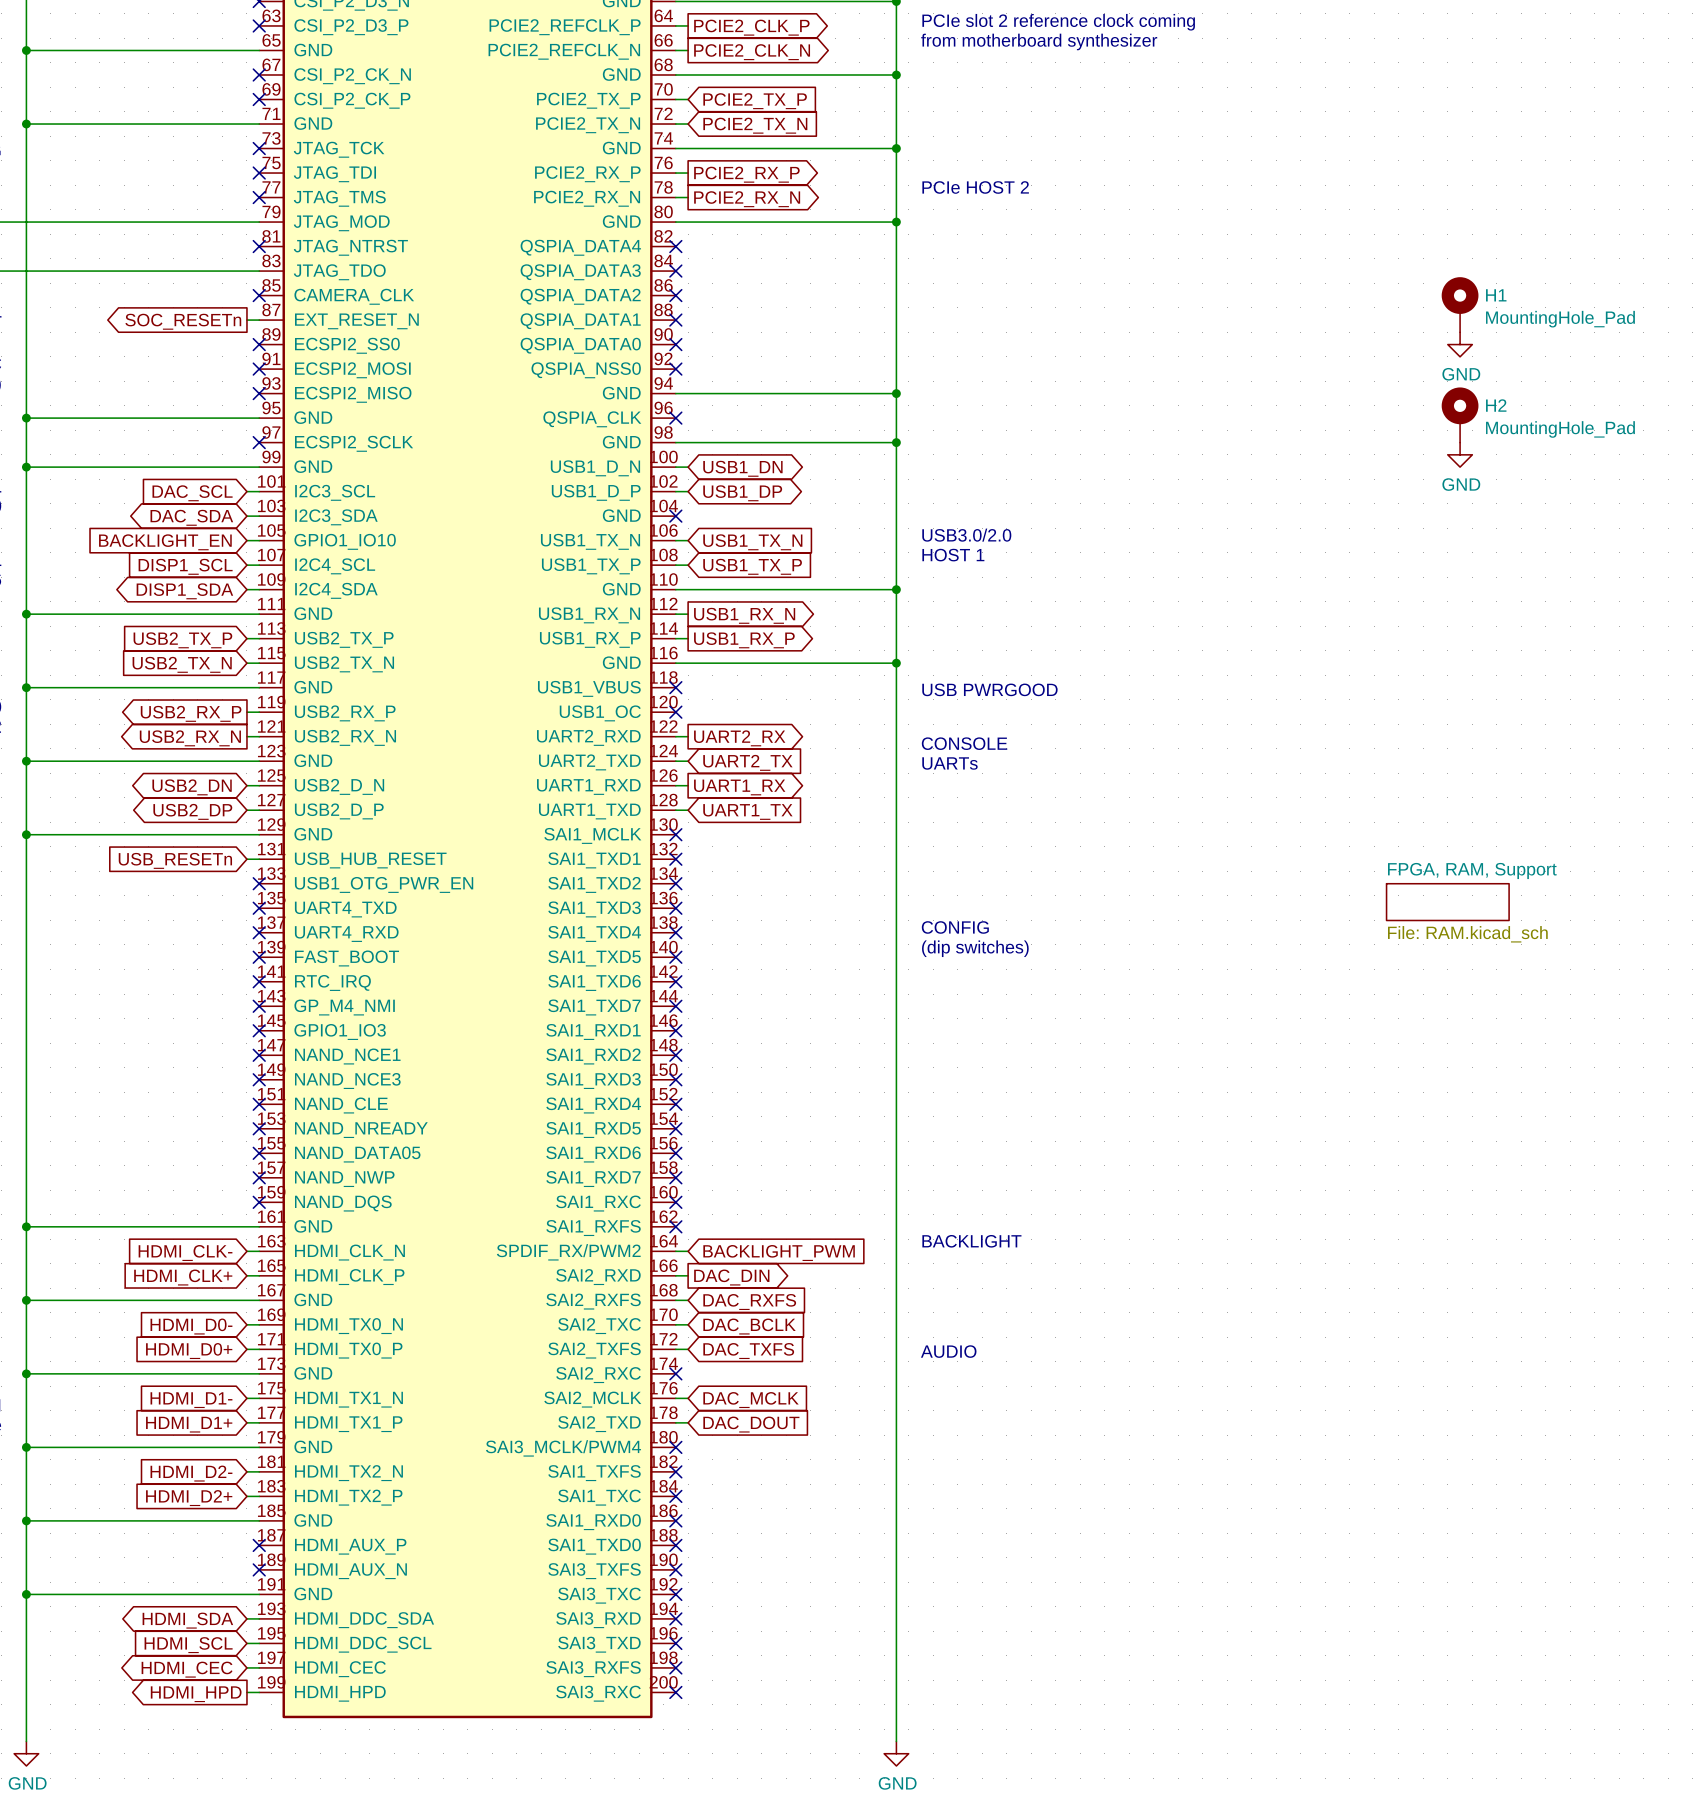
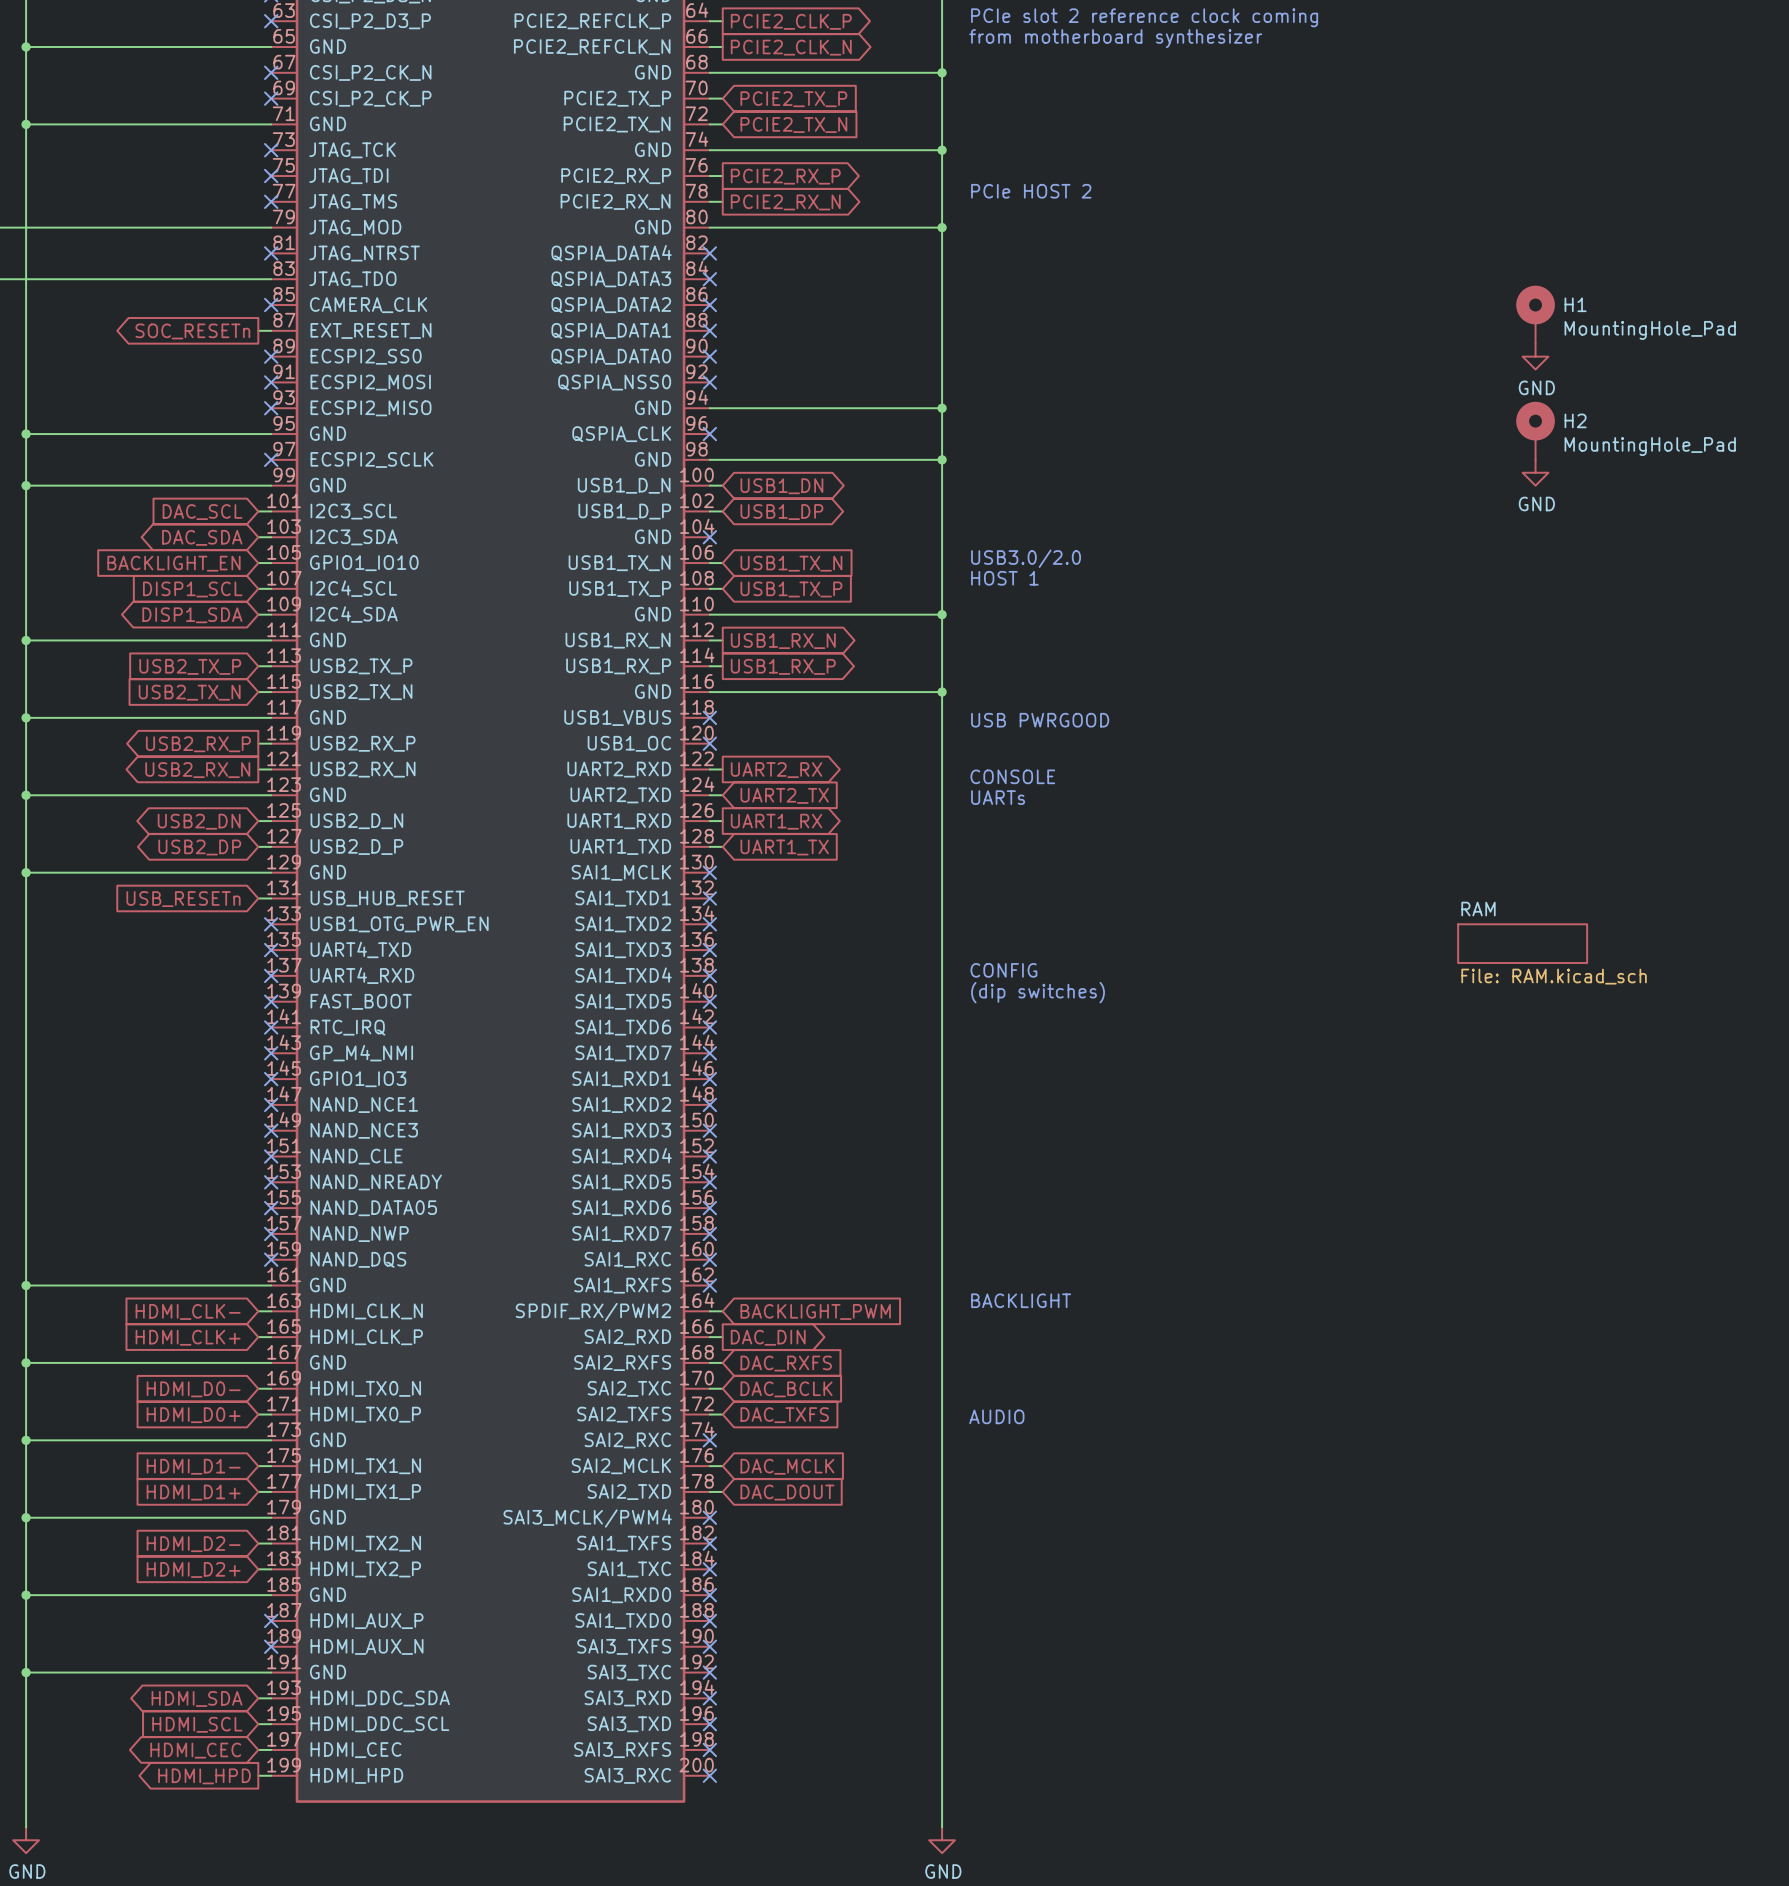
sheet FPGA, RAM, Support name: FPGA, RAM, Support (1472, 870) -> RAM (1478, 909)

